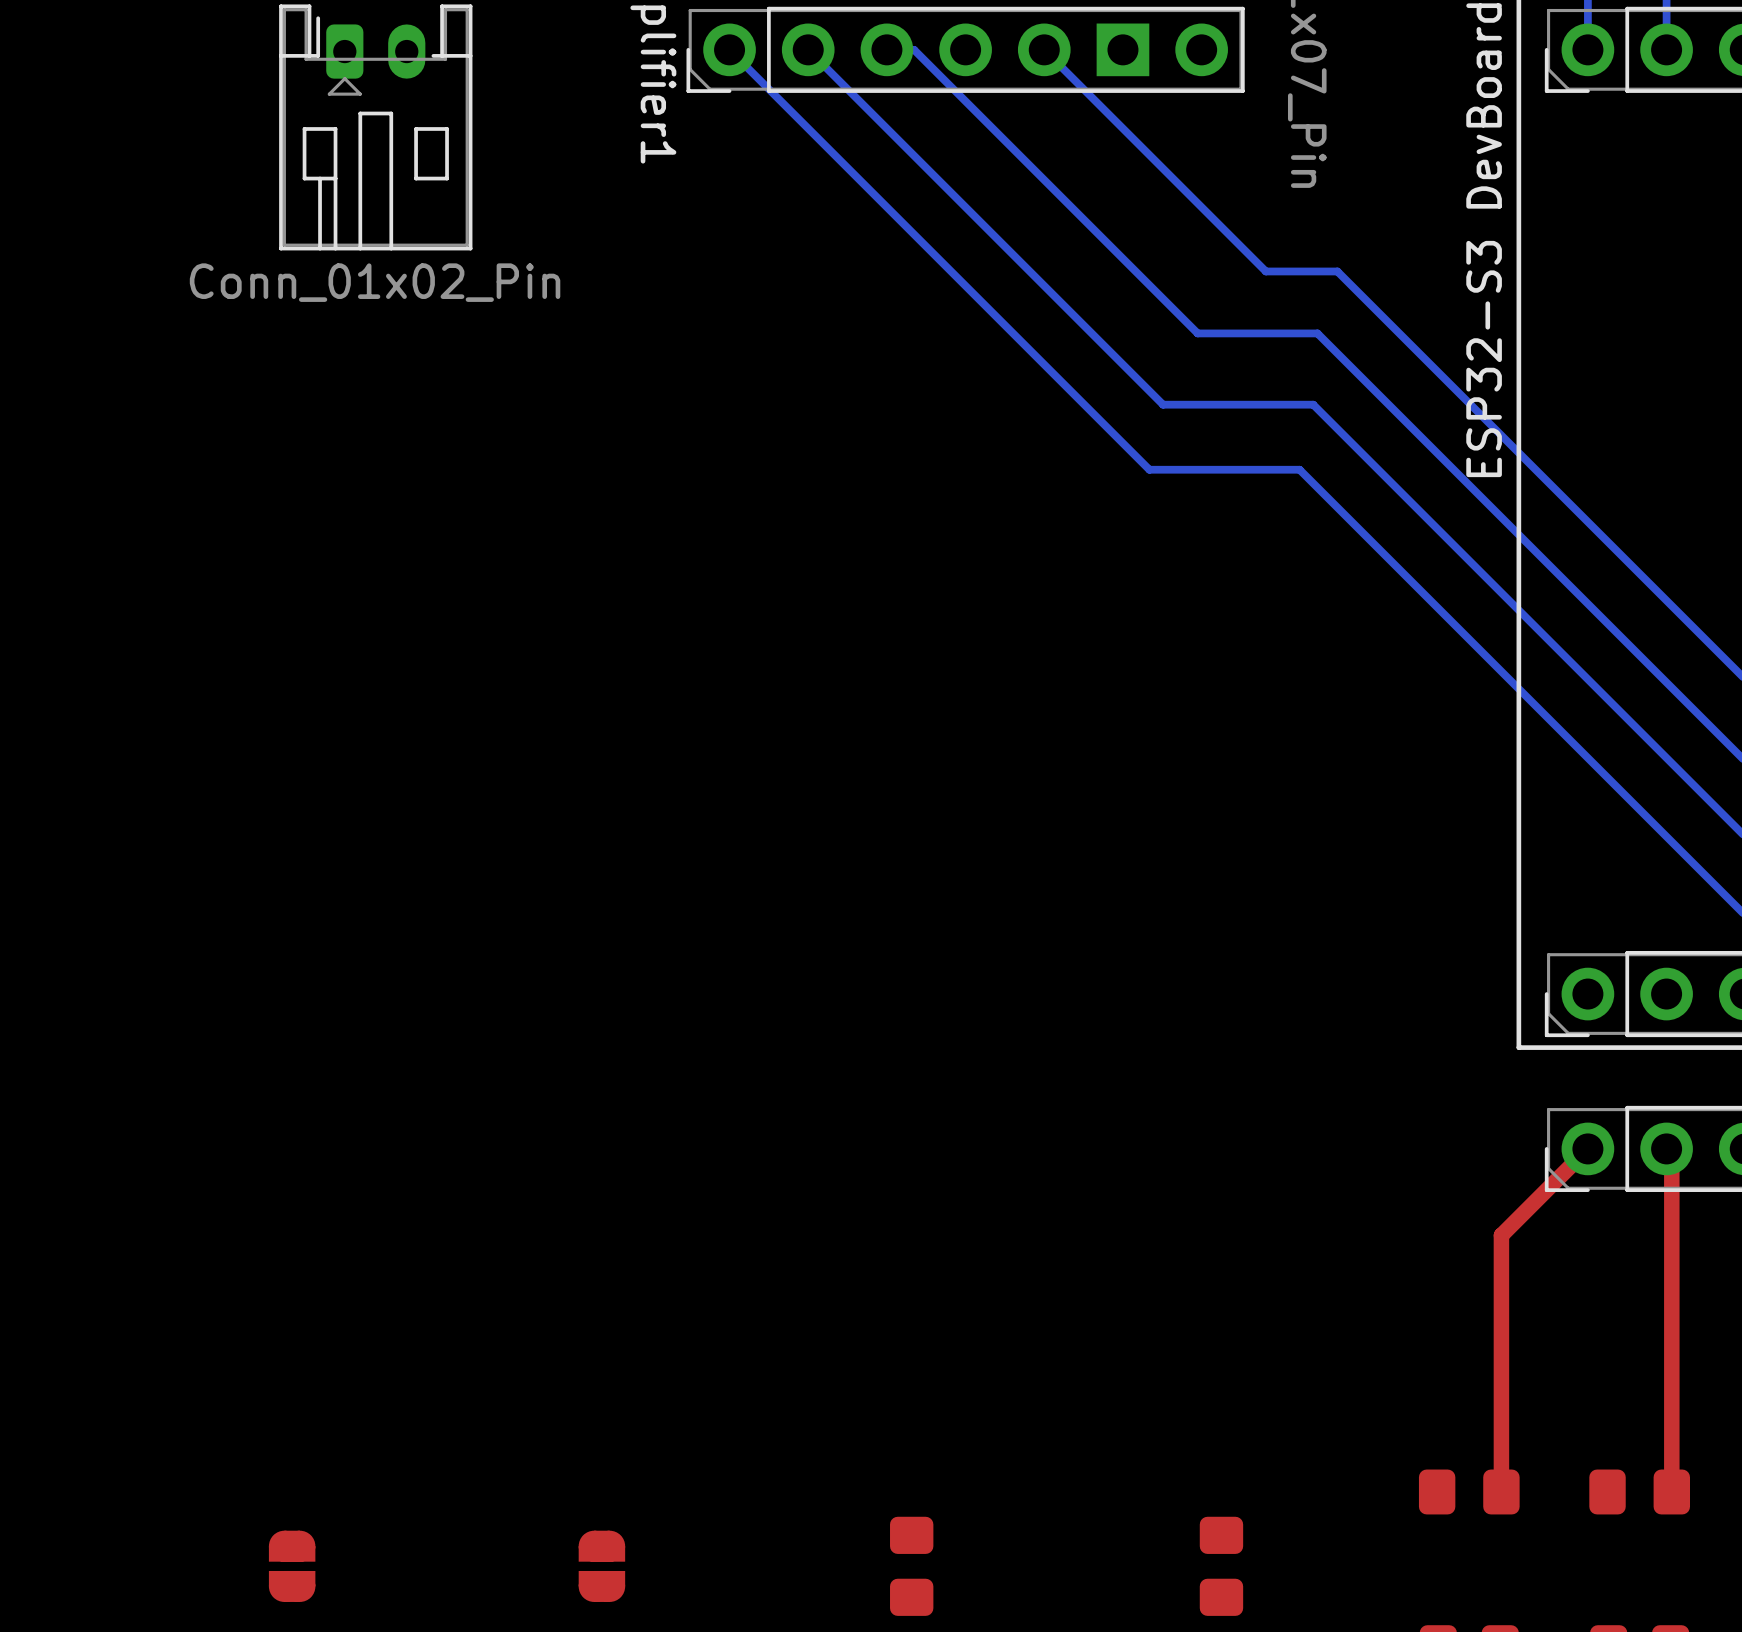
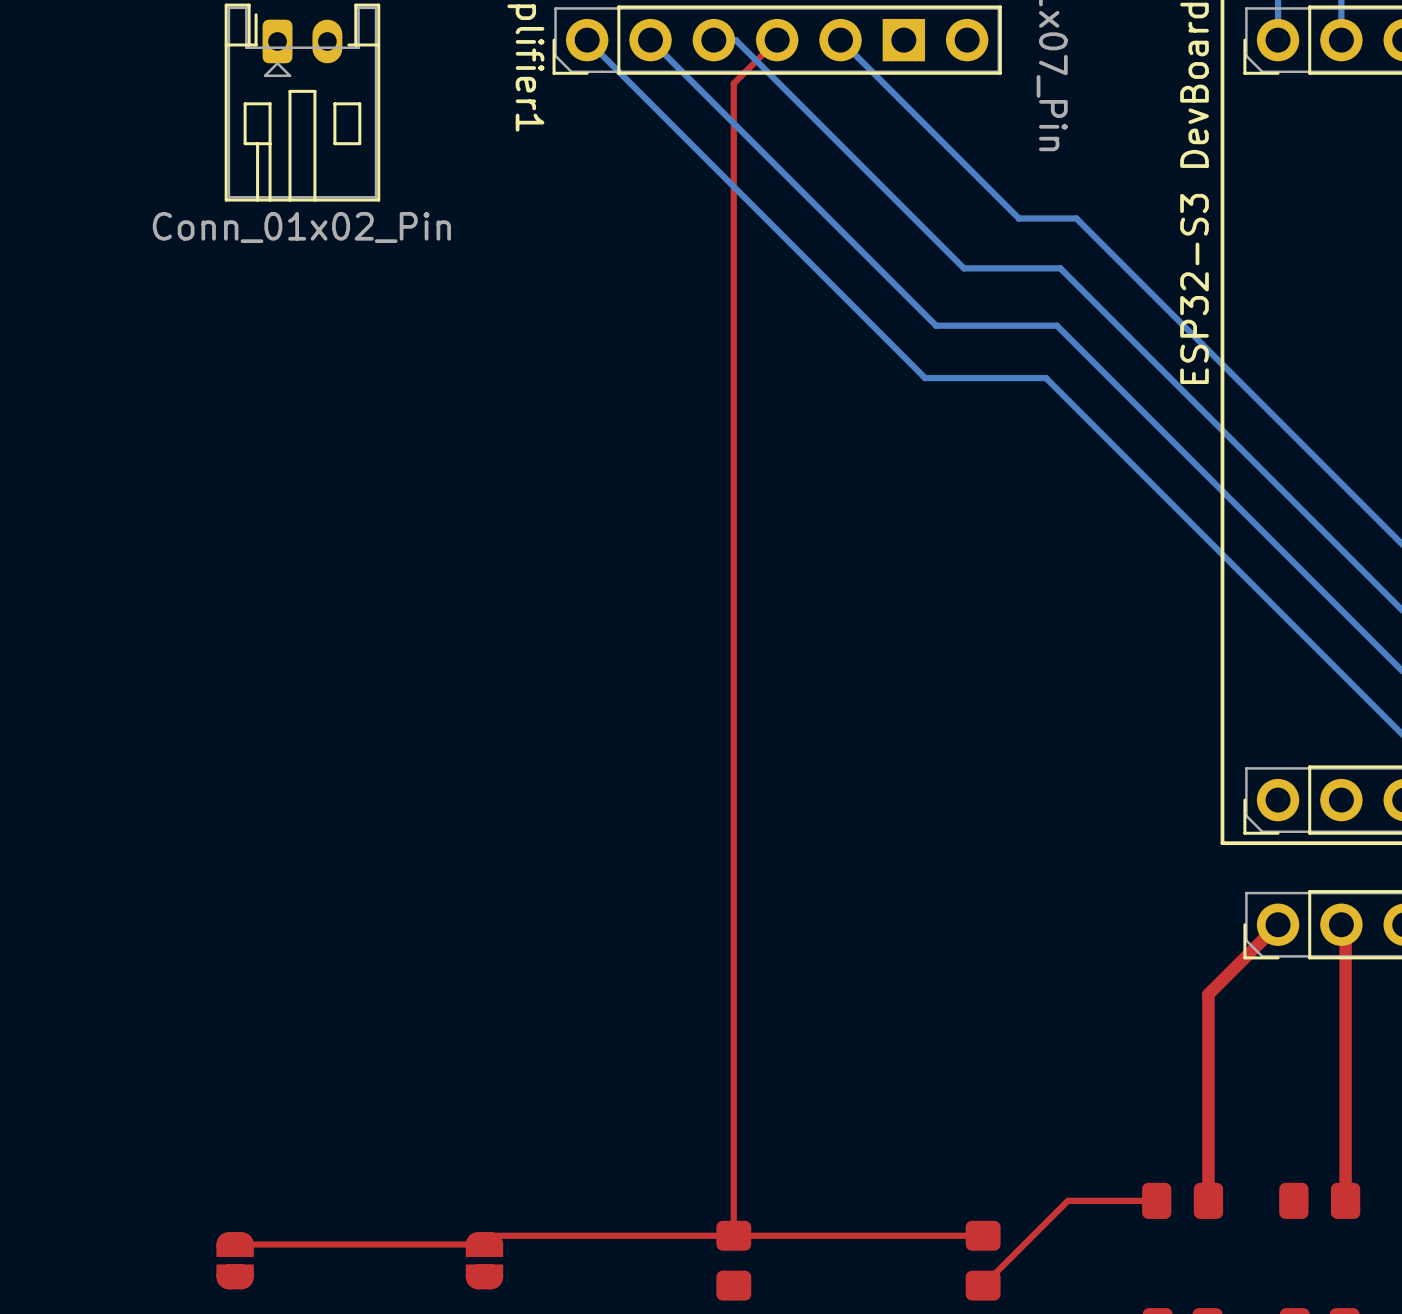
top track: none -> (777, 40) (733, 83) (733, 1235)
top track: none -> (1156, 1200) (1067, 1200) (983, 1285)
top track: none -> (983, 1235) (493, 1235) (484, 1244) (235, 1244)

